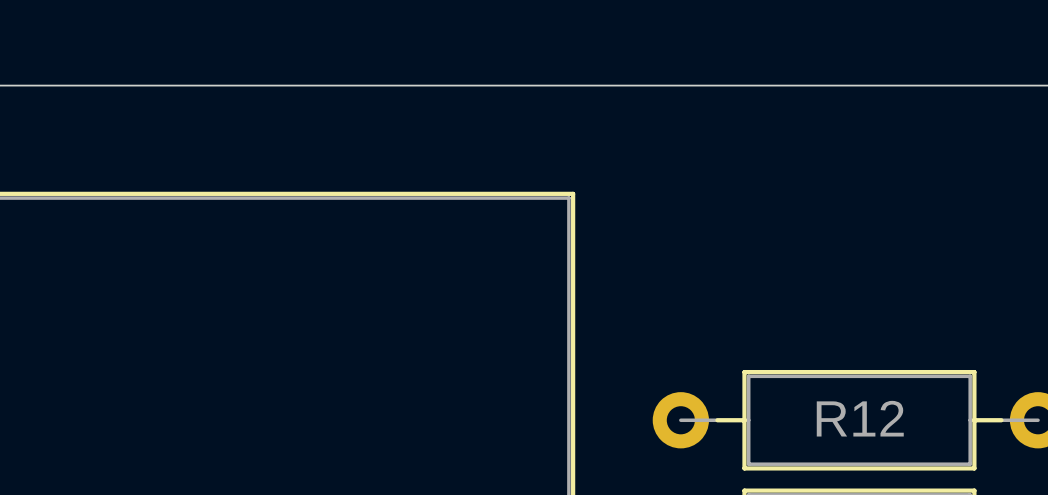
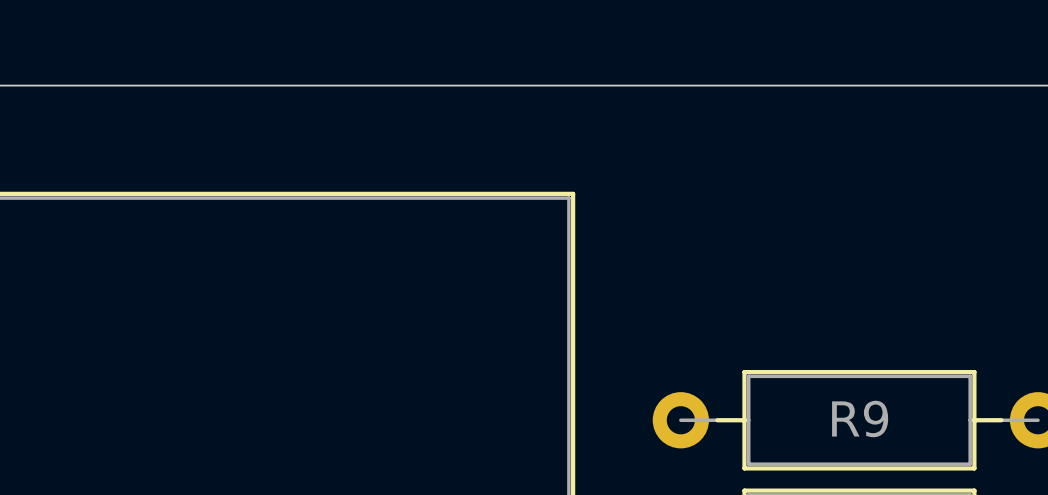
R12 name: R12 (860, 418) -> R9 (860, 418)

